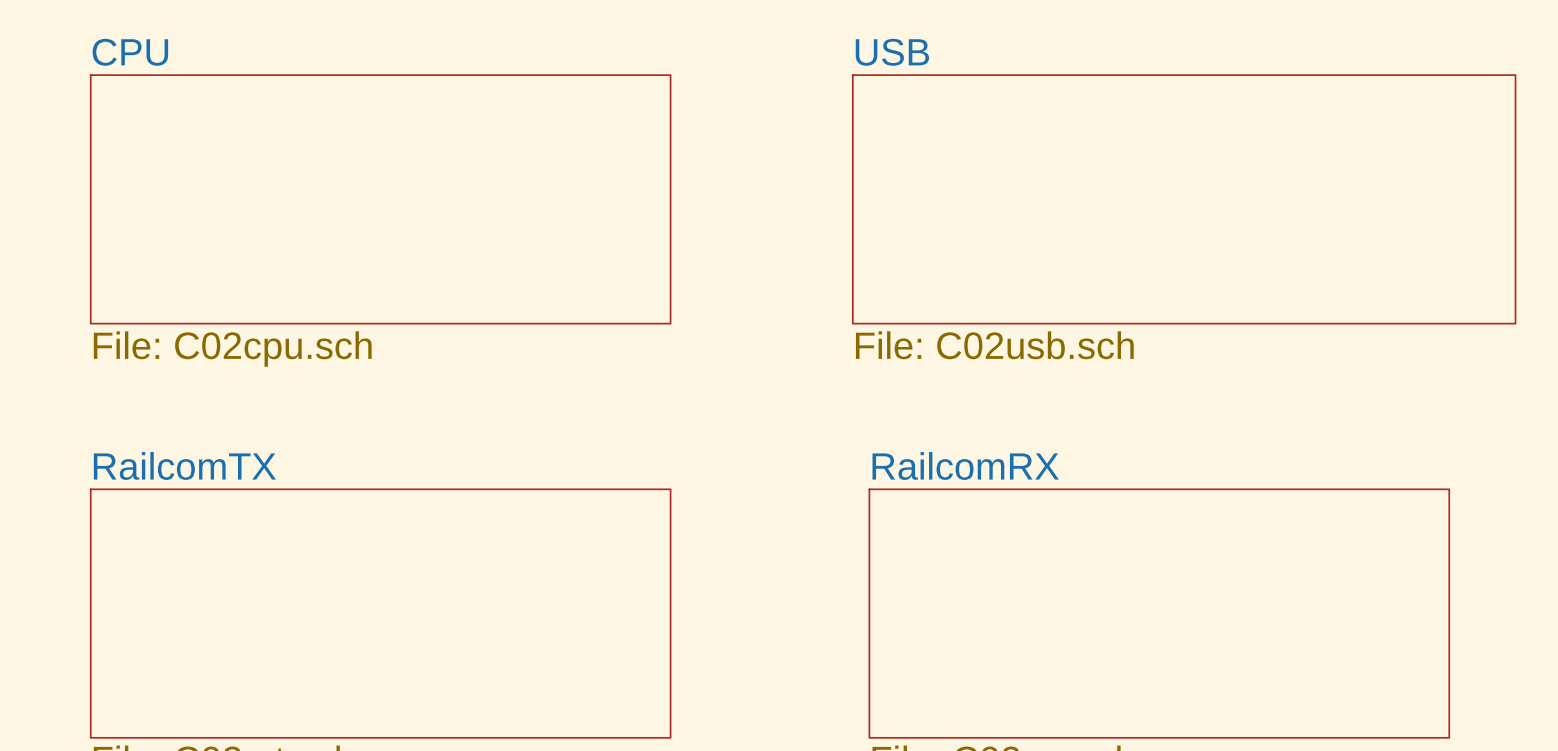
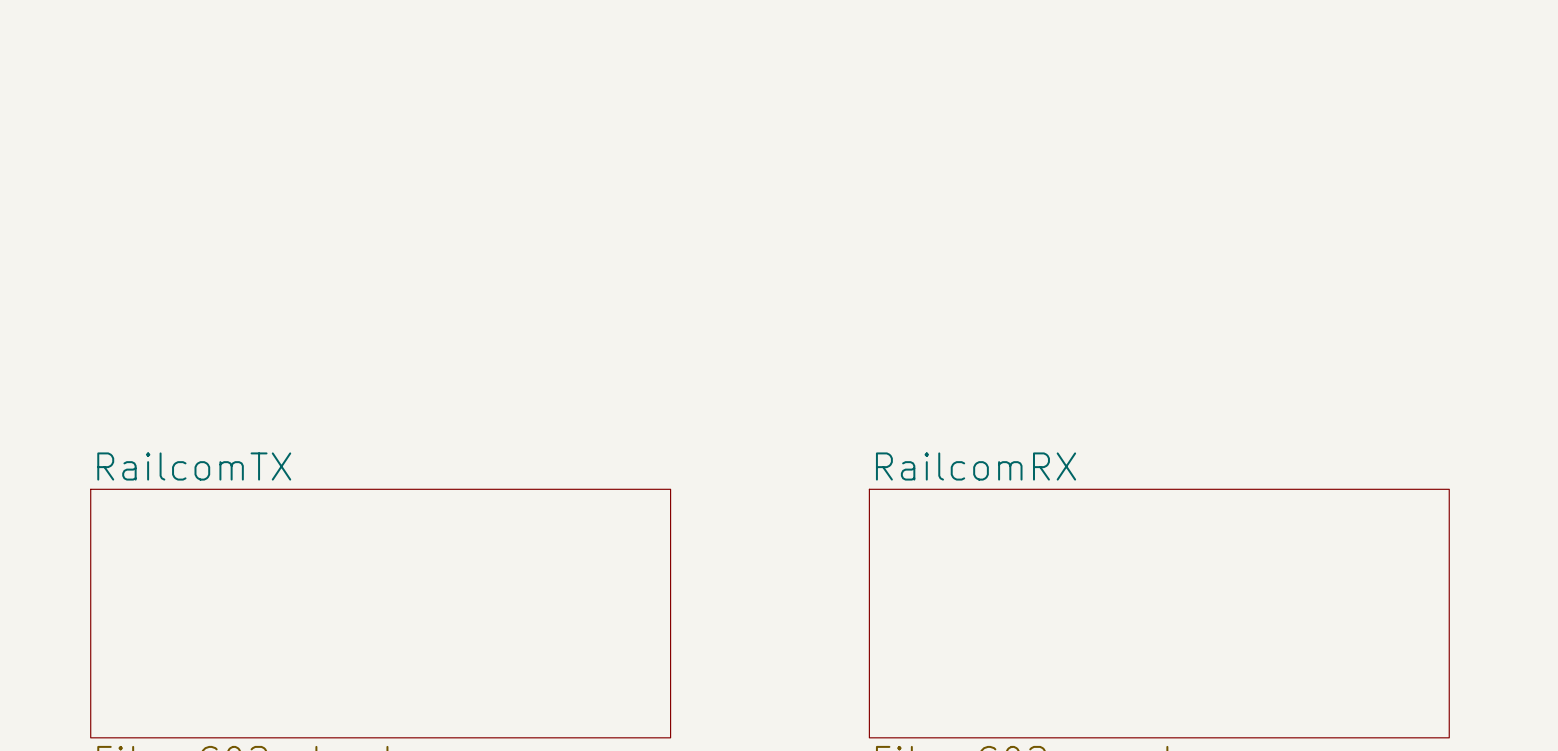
sheet CPU: File: C02cpu.sch (380, 199) -> none
sheet USB: File: C02usb.sch (1184, 199) -> none

